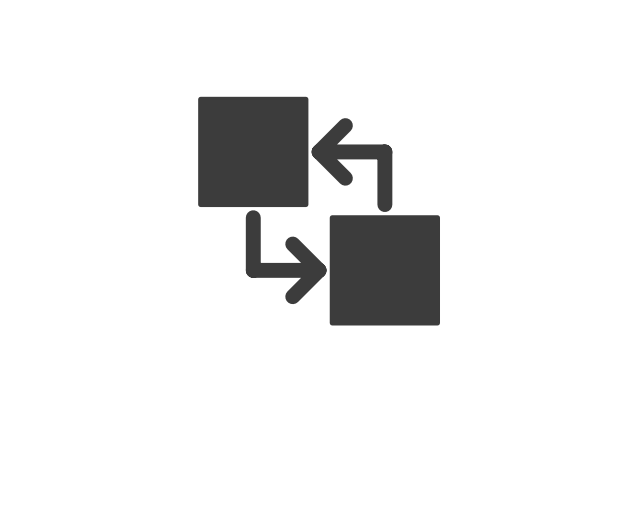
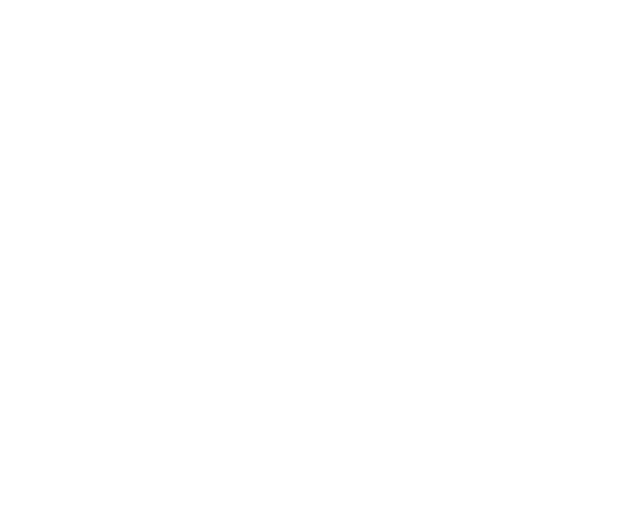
drawing: [198, 96, 441, 326] -> none
line: (345, 125) (319, 151) (345, 178) -> none
line: (332, 151) (384, 151) (384, 204) -> none
line: (253, 217) (253, 270) (305, 270) -> none
line: (292, 244) (319, 270) (292, 296) -> none

